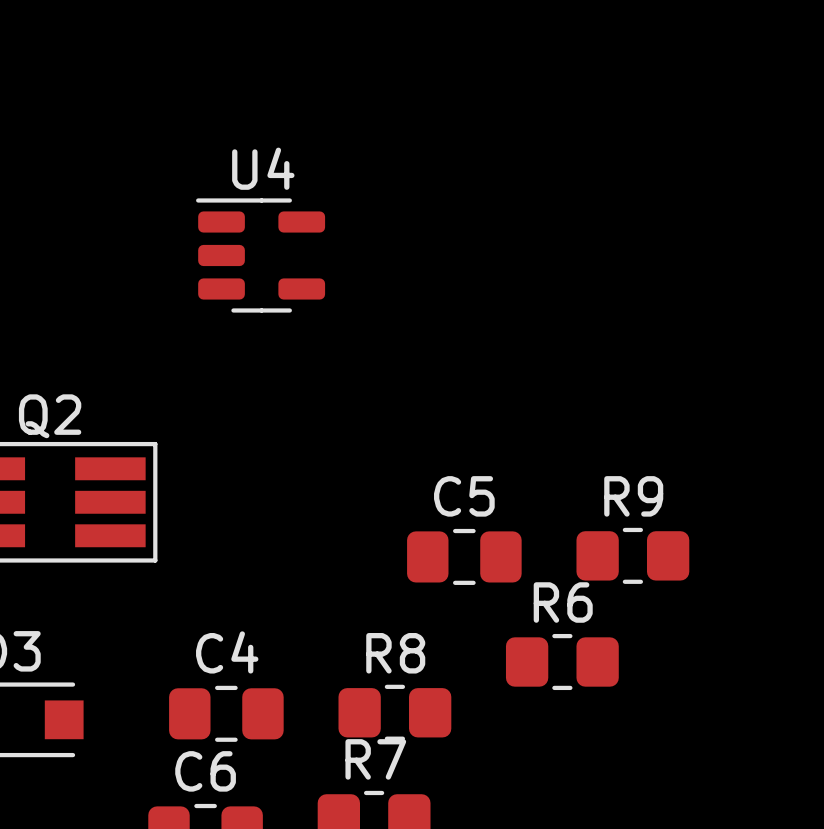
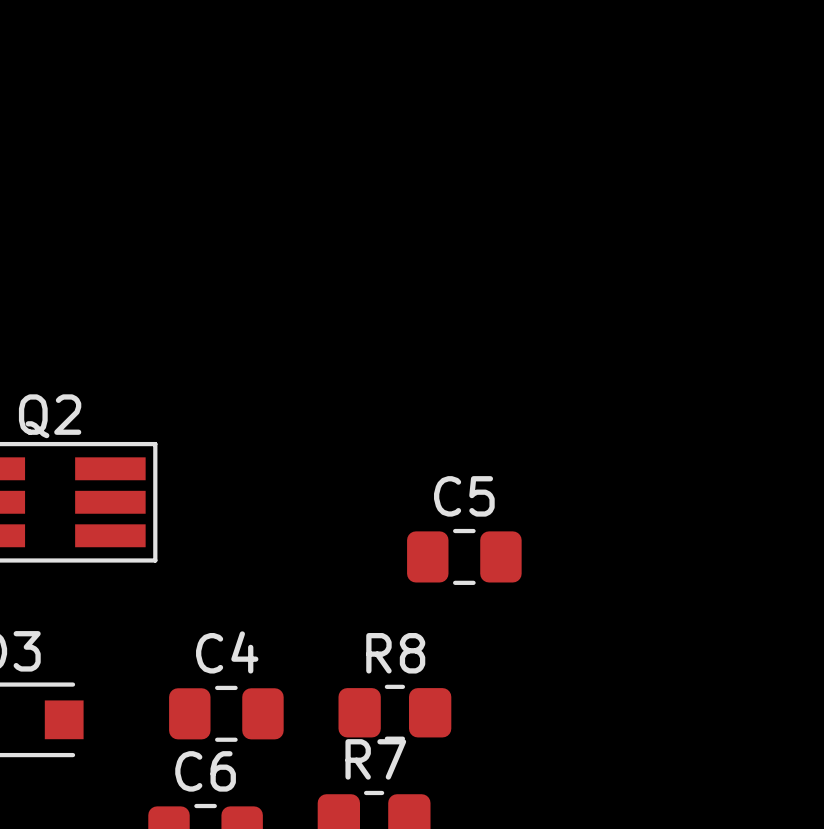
U4: (260, 255) -> none
R9: (632, 555) -> none
R6: (562, 662) -> none

